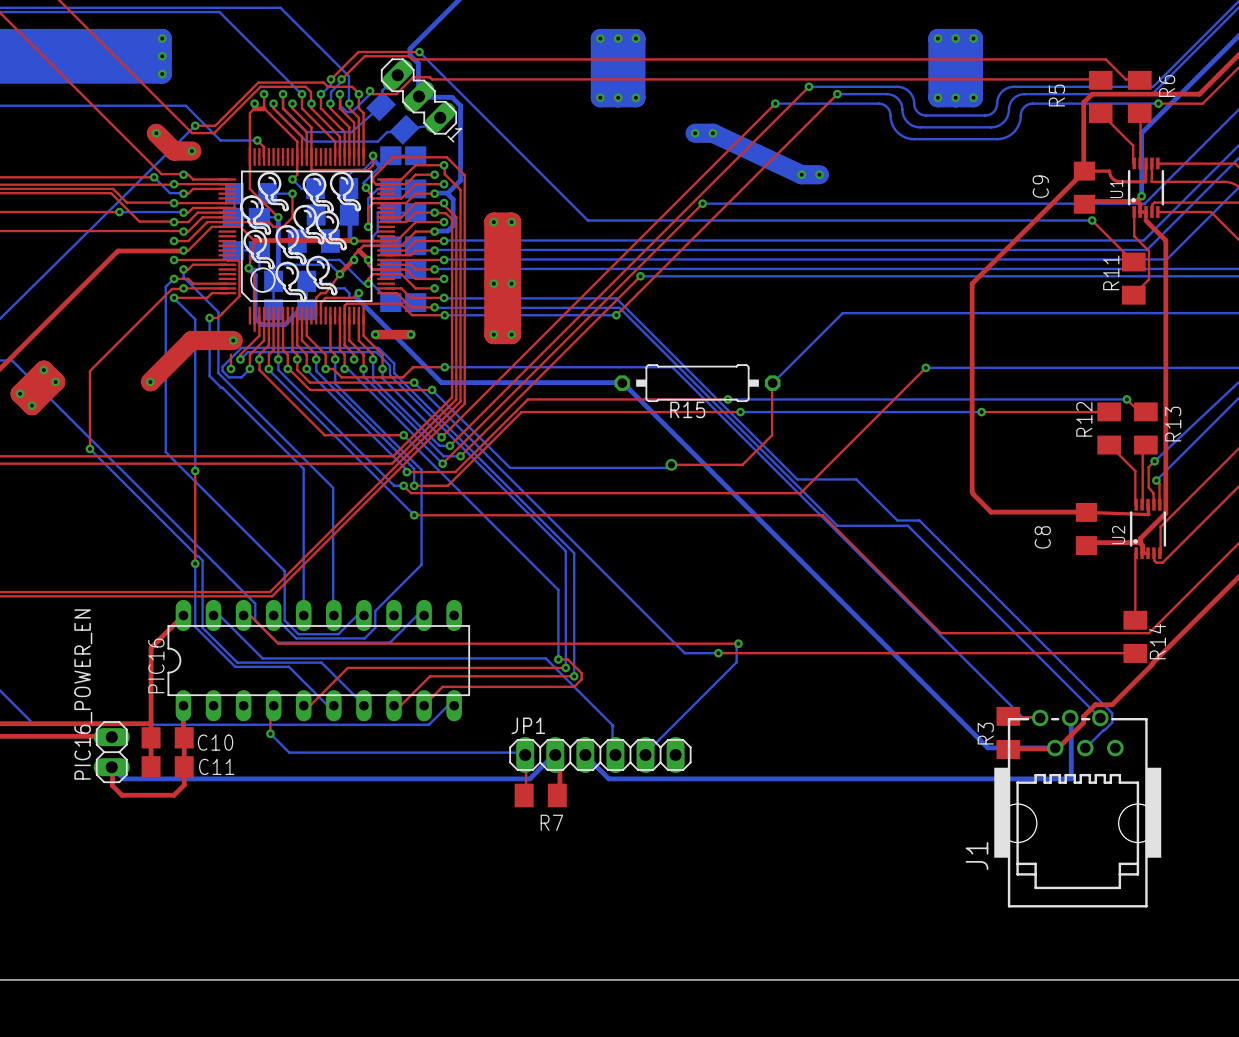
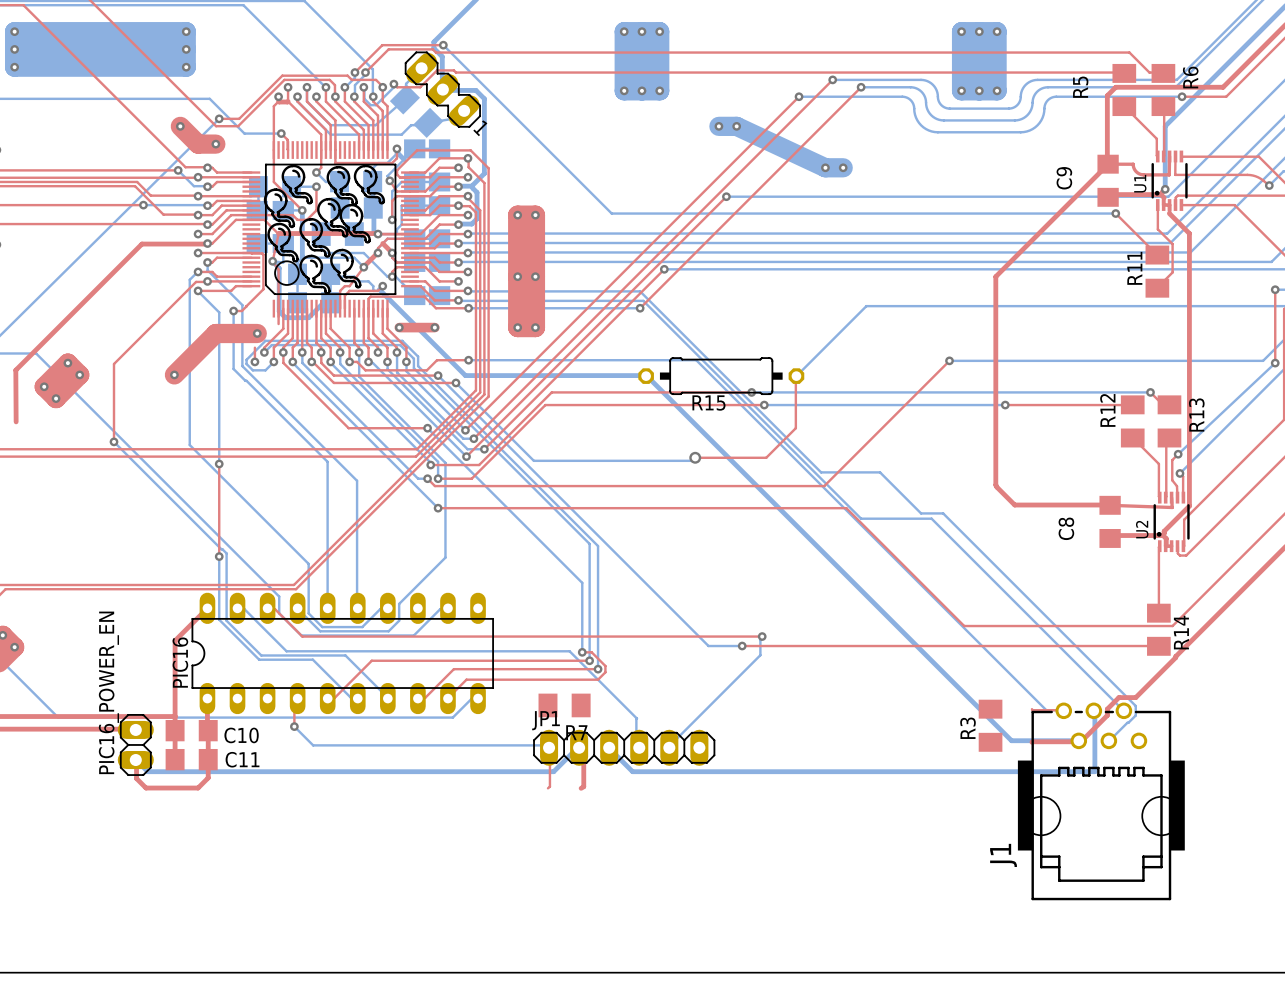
R3 position: (1008, 732) -> (990, 725)
R7 position: (540, 795) -> (564, 705)

